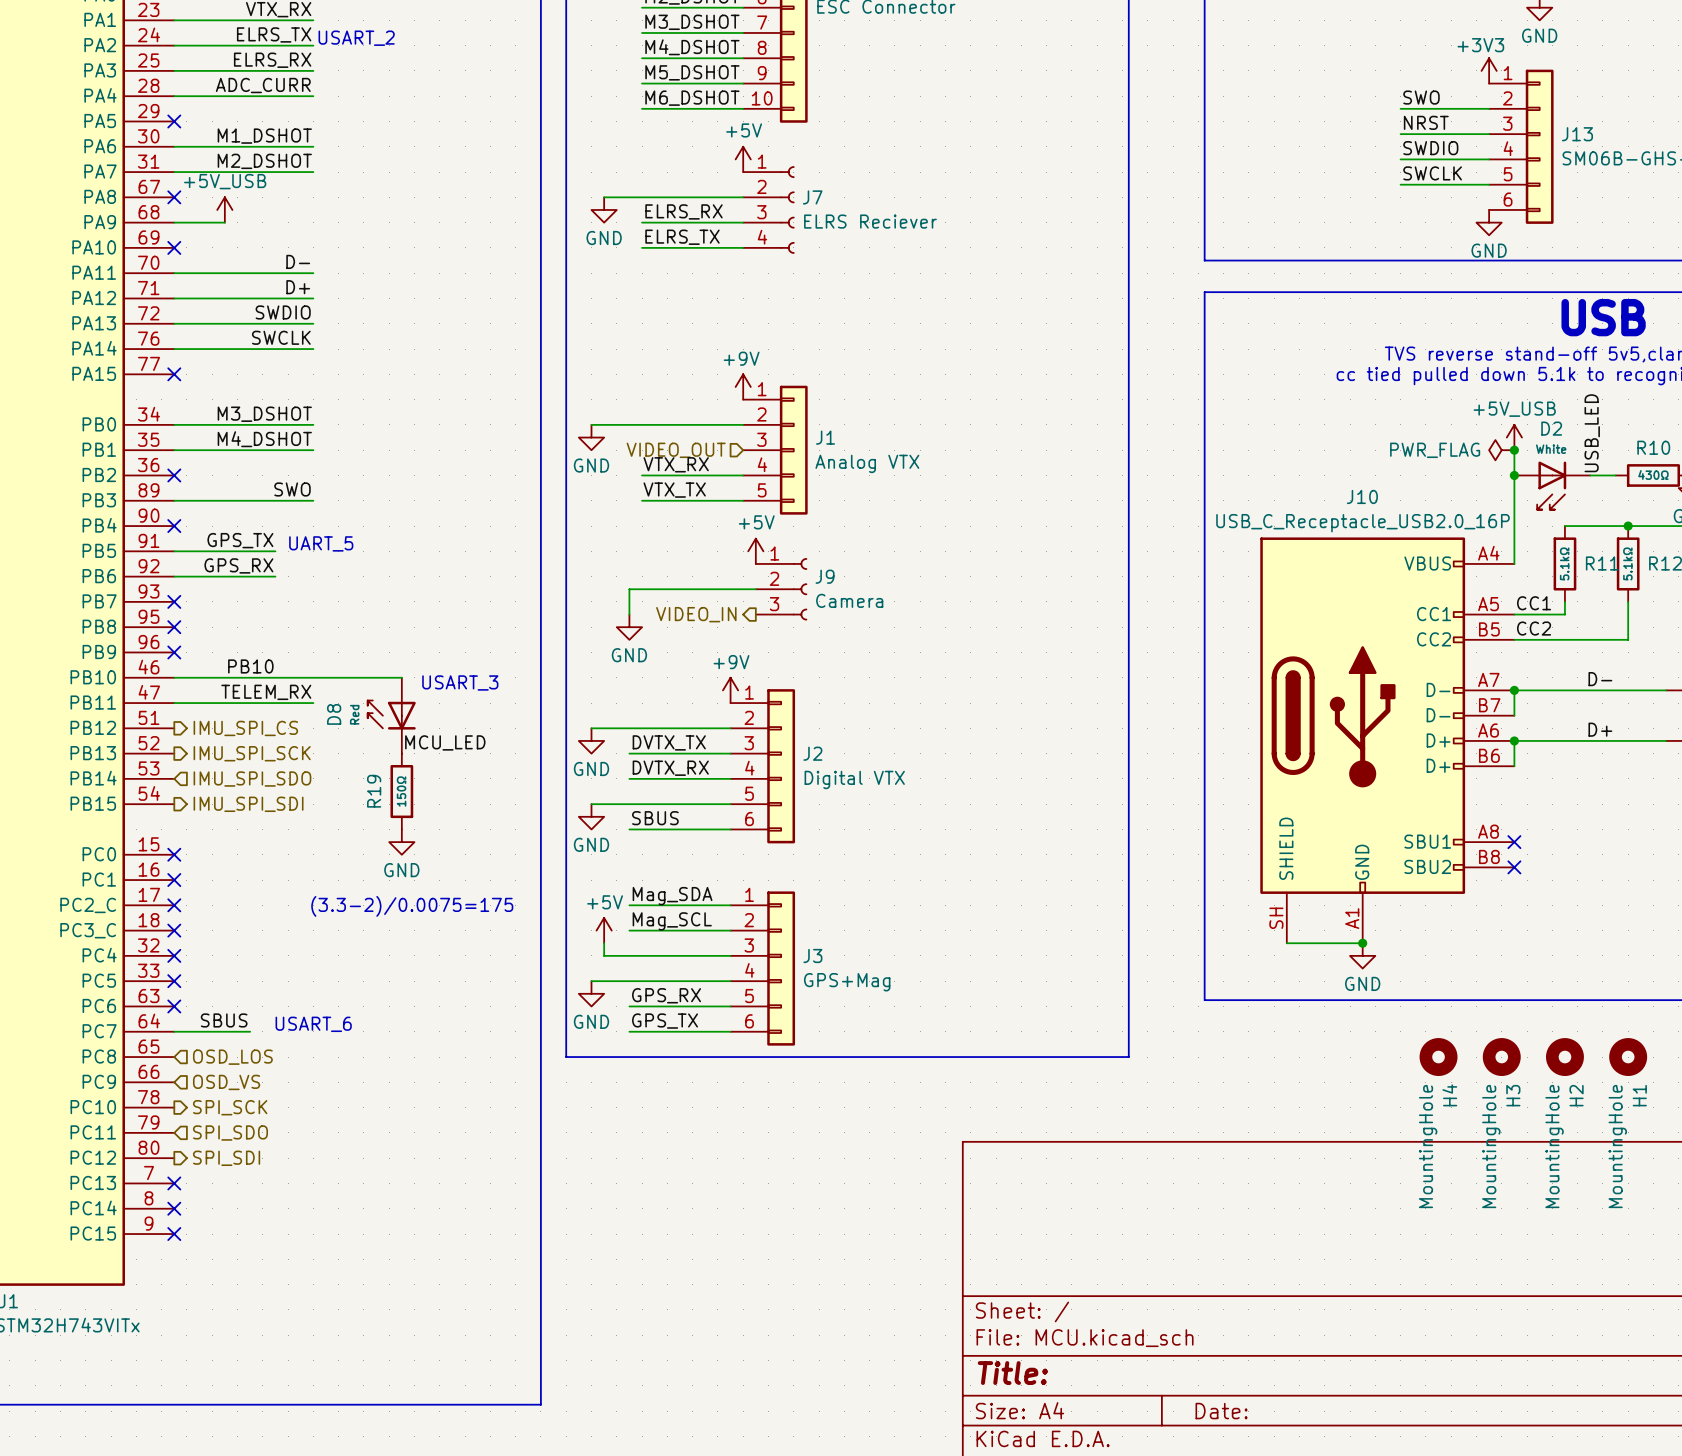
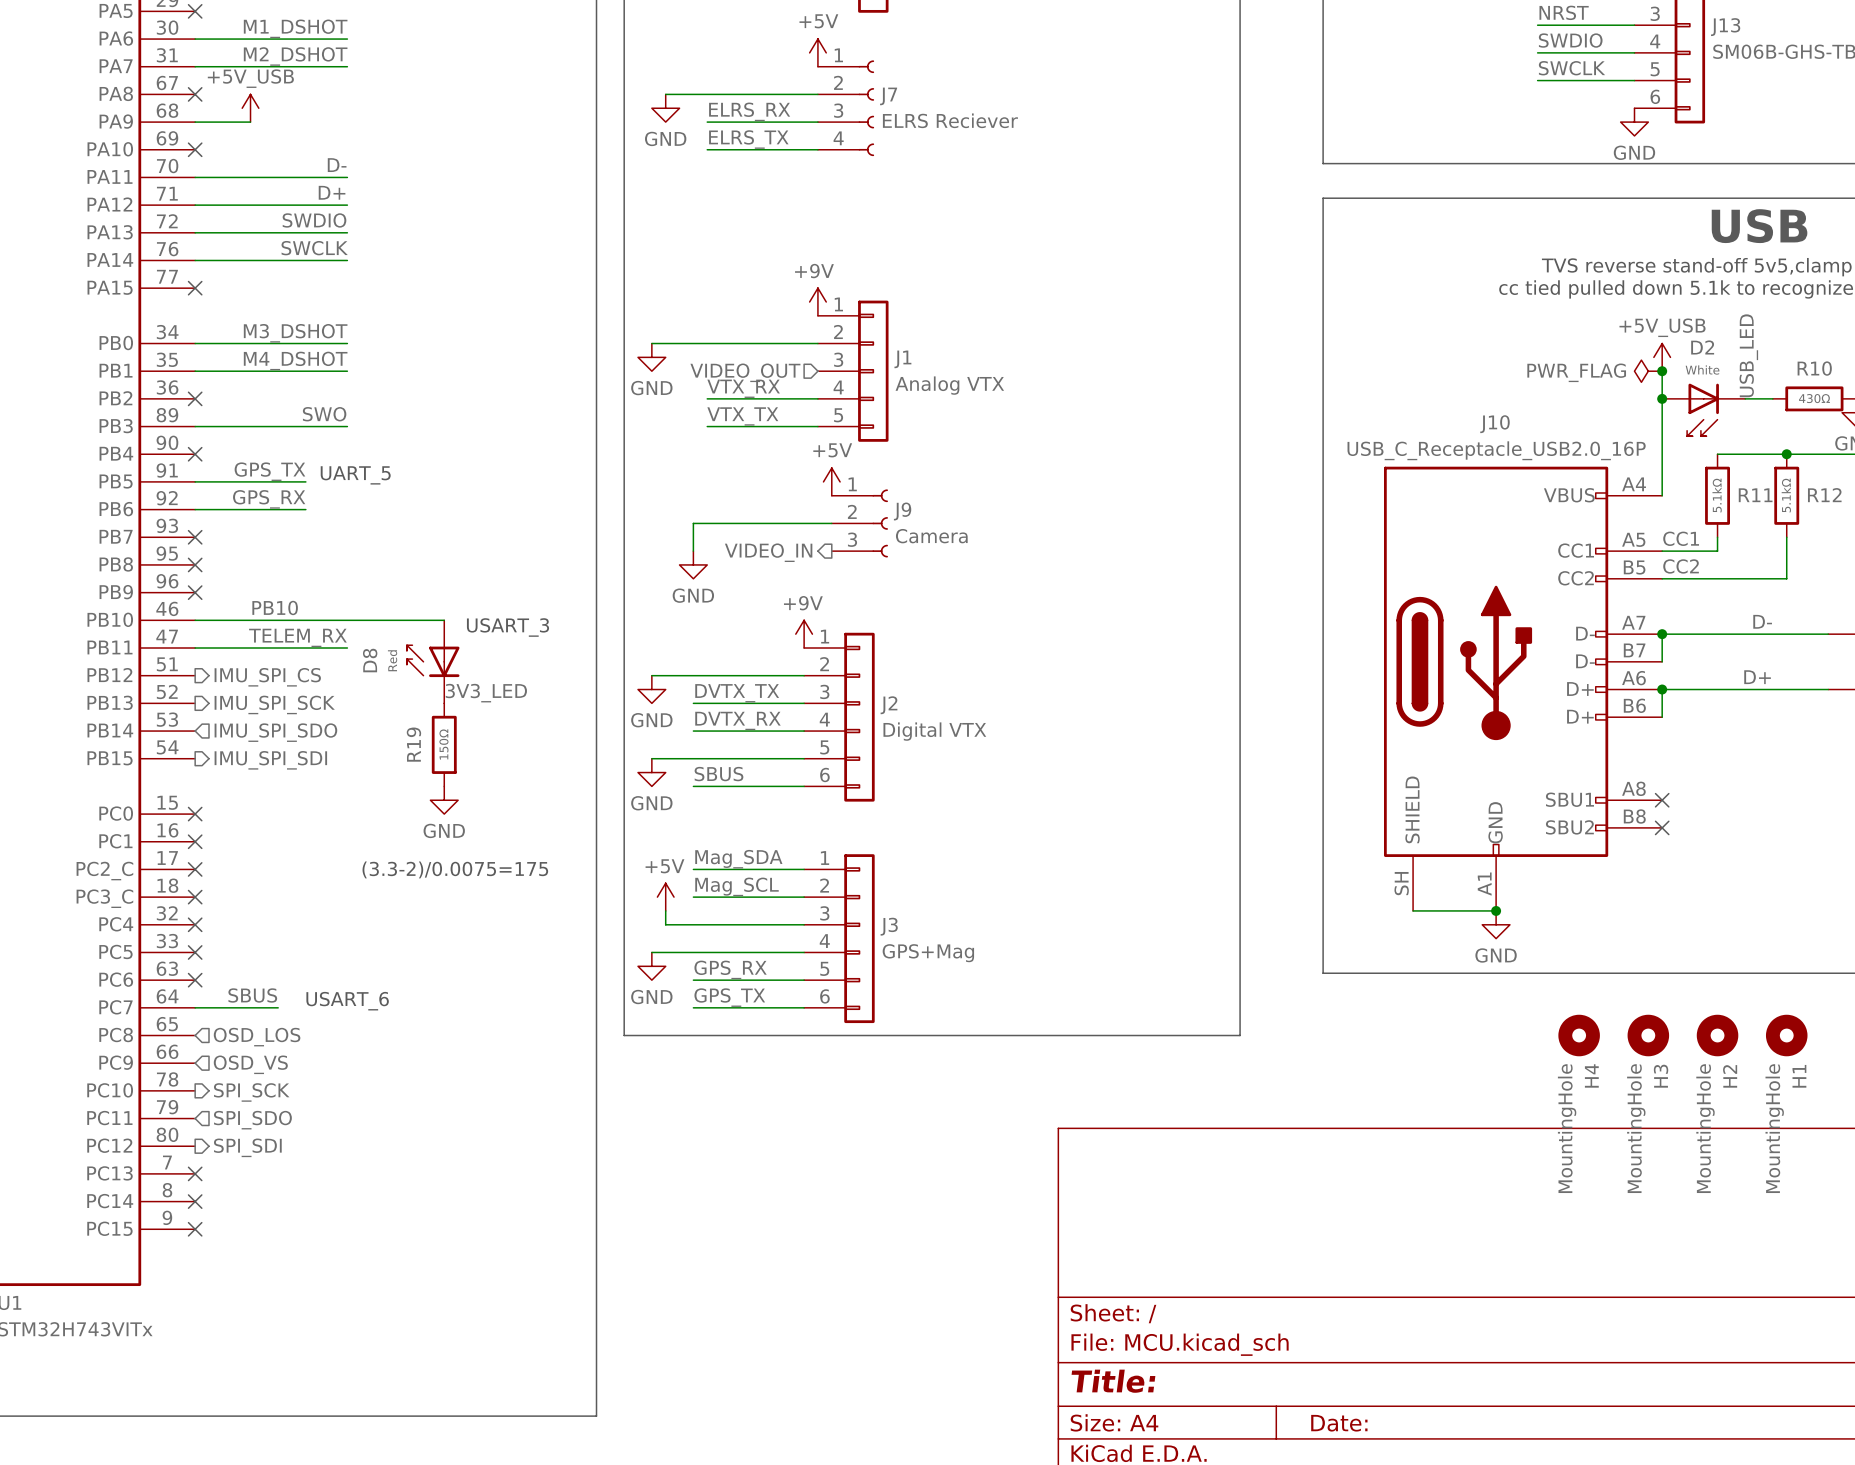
label: MCU_LED (445, 742) -> 3V3_LED (486, 693)

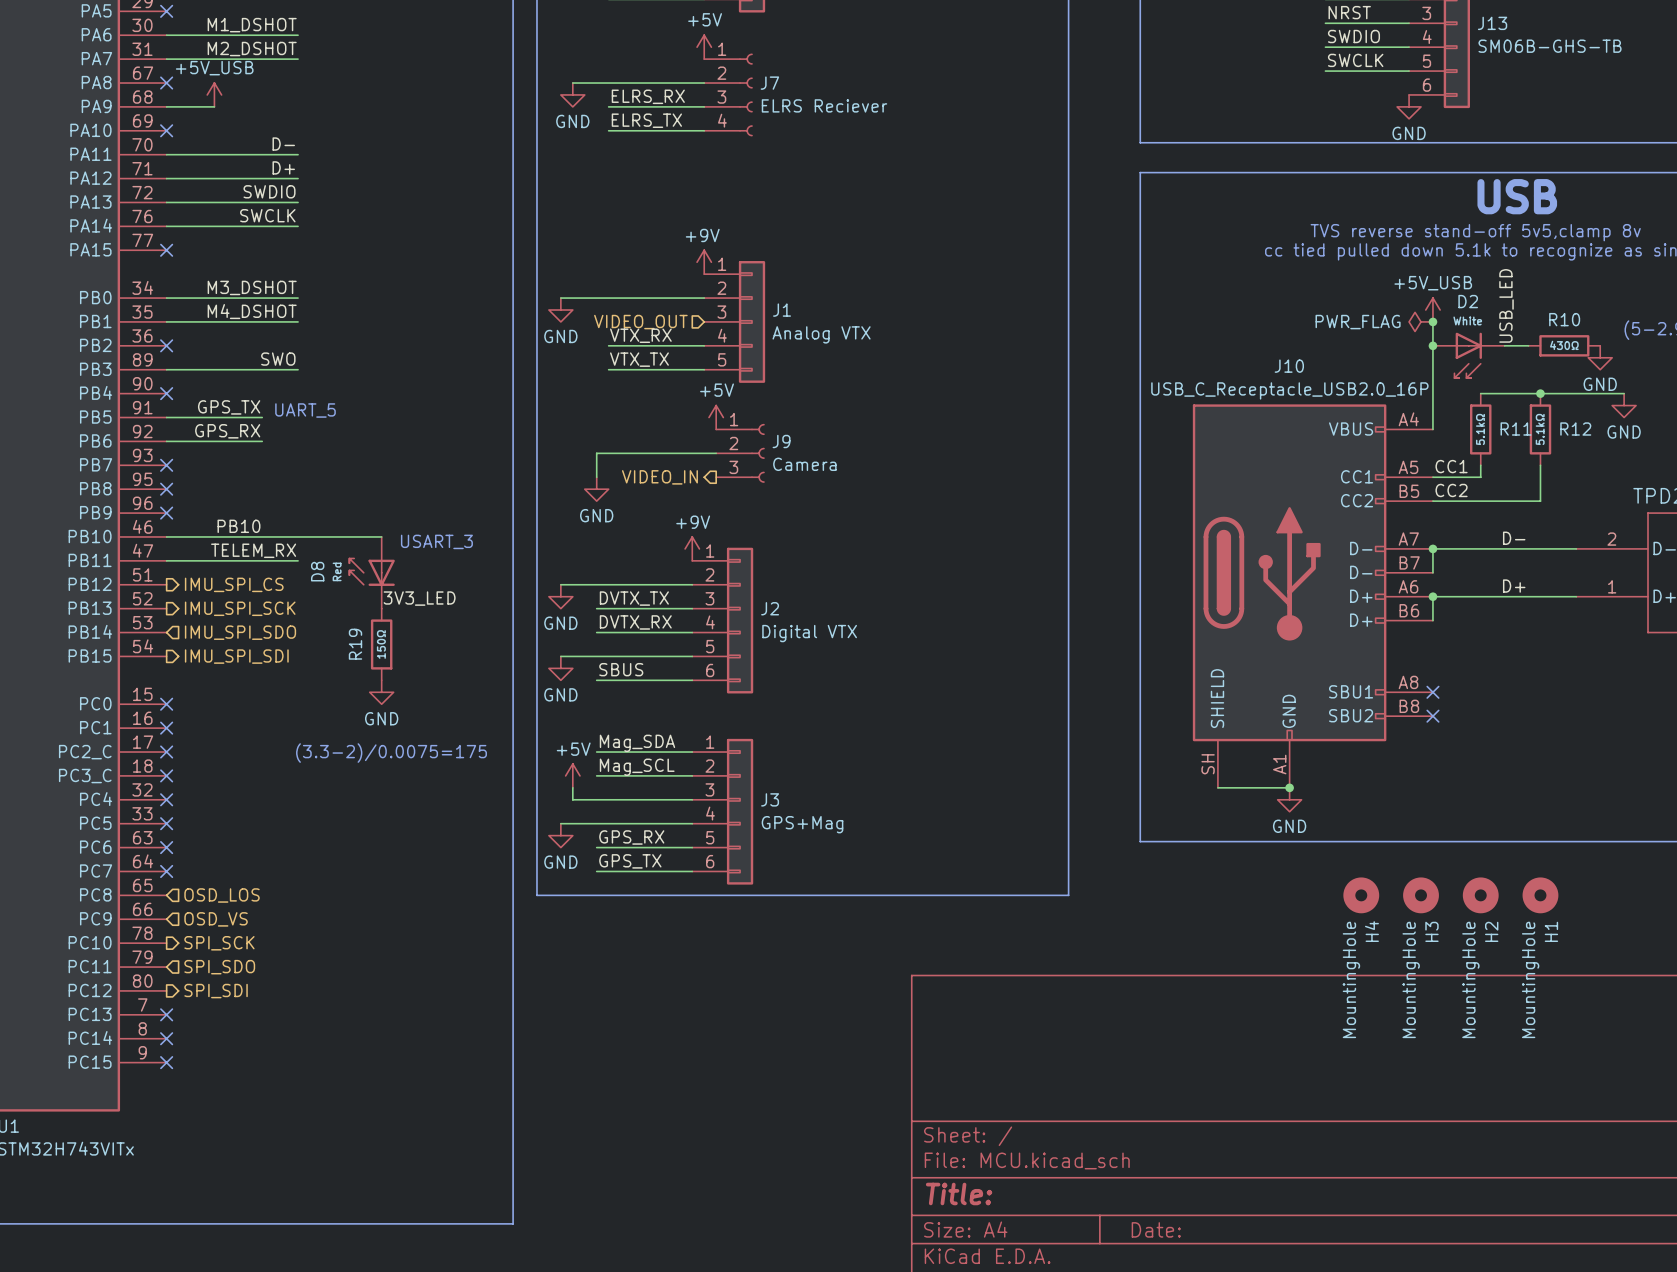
label: SBUS (252, 995) -> none
text: USART_6 (347, 1001) -> none
wire: (195, 1007) (278, 1007) -> none
no-connect mark: none -> (166, 871)

